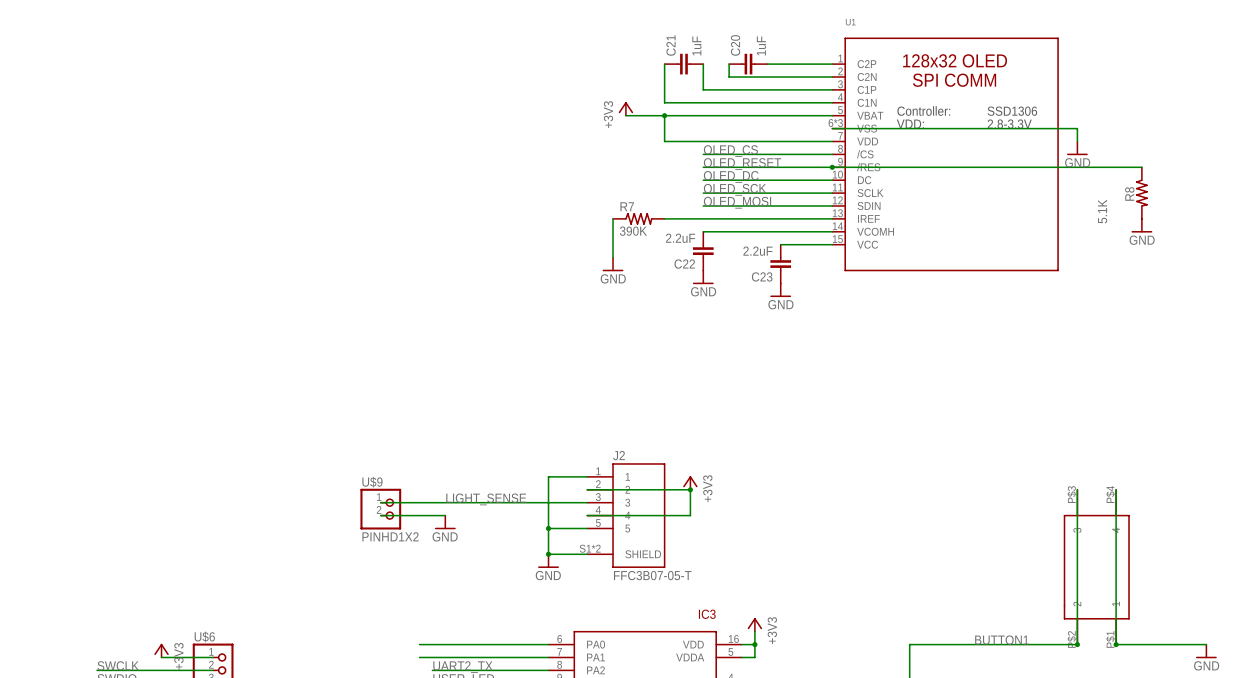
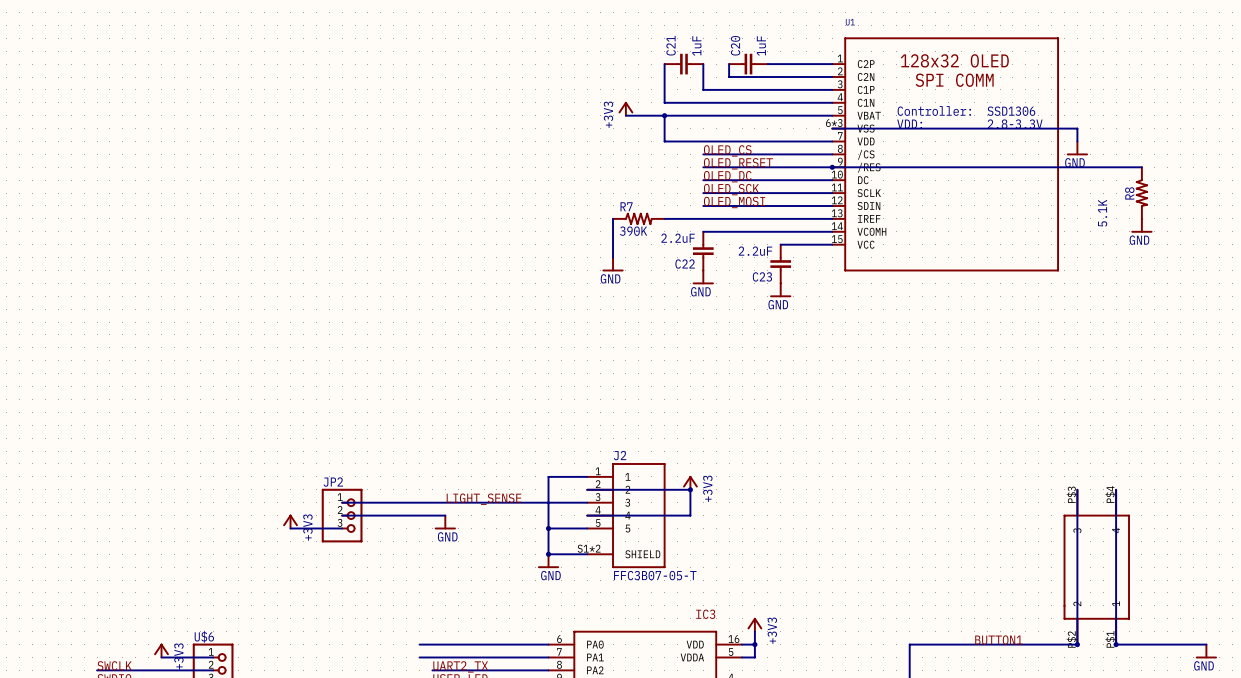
wire: none -> (342, 502) (380, 502)
U$9: PINHD1X2 (380, 509) -> none
wire: none -> (342, 515) (380, 515)
JP2: none -> (342, 515)
power symbol: none -> +3V3 (290, 521)
wire: none -> (290, 528) (342, 528)

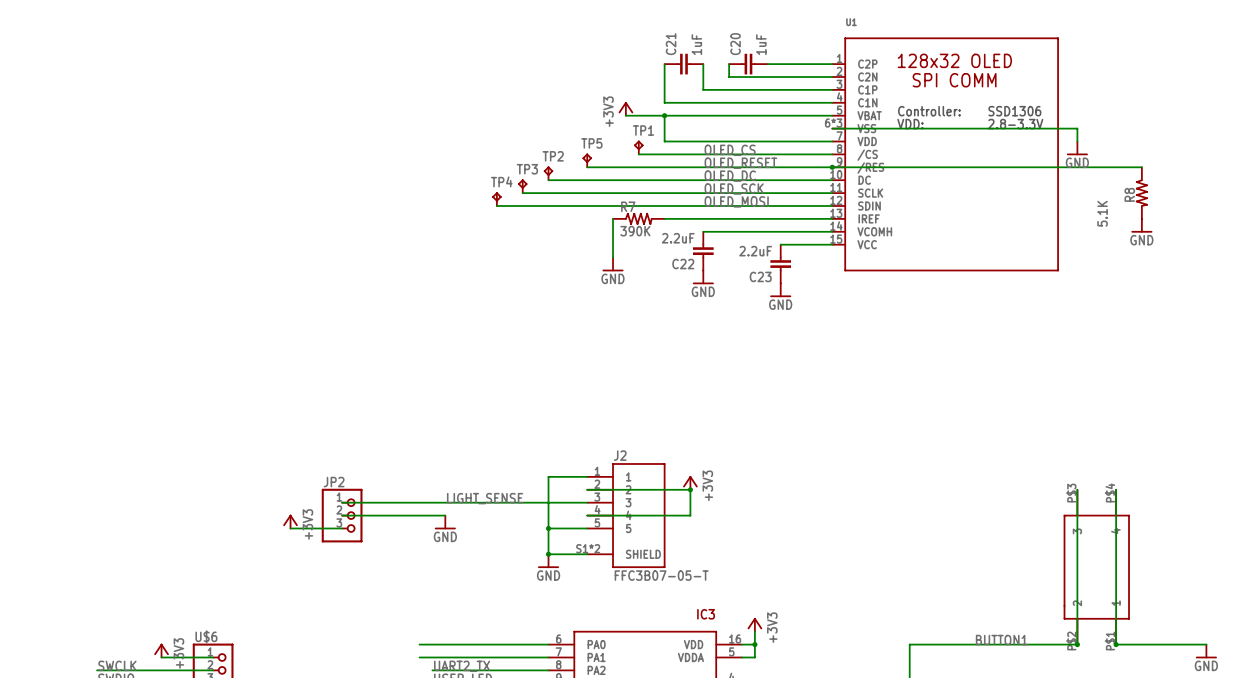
TP1: none -> (638, 147)
wire: none -> (638, 154) (703, 154)
TP5: none -> (587, 160)
wire: none -> (587, 167) (703, 167)
TP2: none -> (548, 173)
wire: none -> (548, 180) (703, 180)
TP3: none -> (522, 186)
wire: none -> (522, 193) (703, 193)
TP4: none -> (496, 199)
wire: none -> (496, 205) (703, 205)

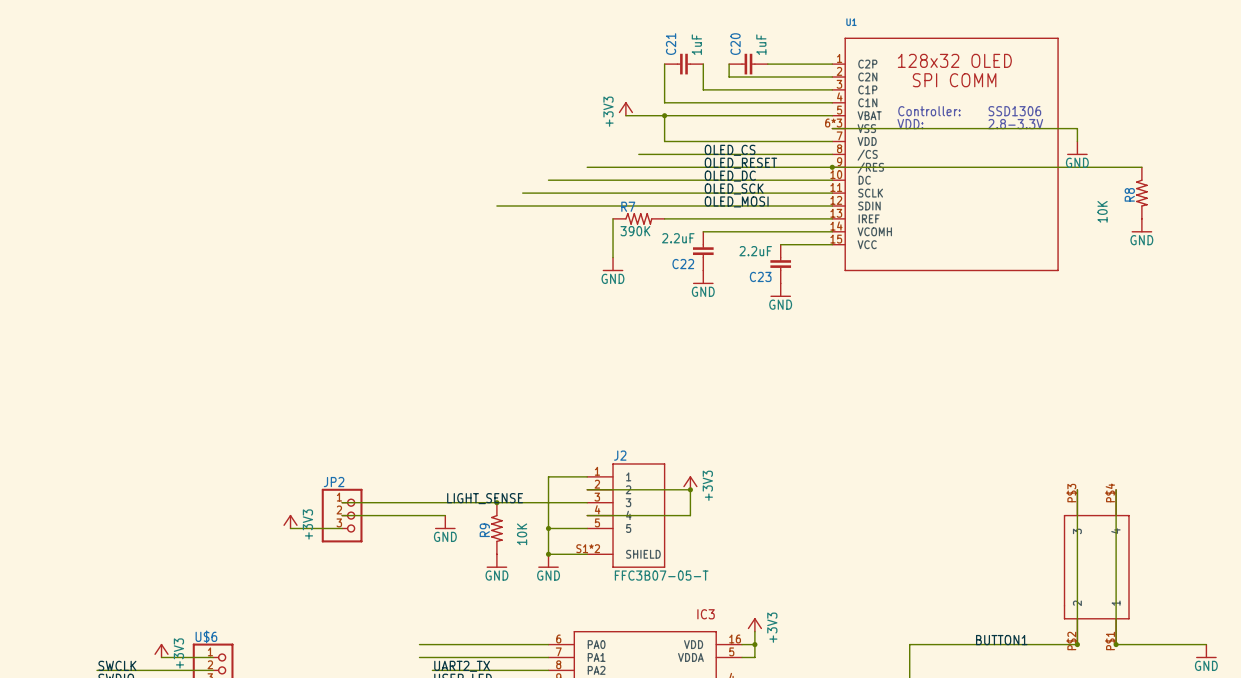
TP1: (638, 147) -> none
TP5: (587, 160) -> none
TP2: (548, 173) -> none
TP3: (522, 186) -> none
TP4: (496, 199) -> none
R8 value: 5.1K (1102, 213) -> 10K (1102, 211)
junction: none -> (496, 502)
R9: none -> 10K (496, 528)
power symbol: none -> GND (496, 561)

